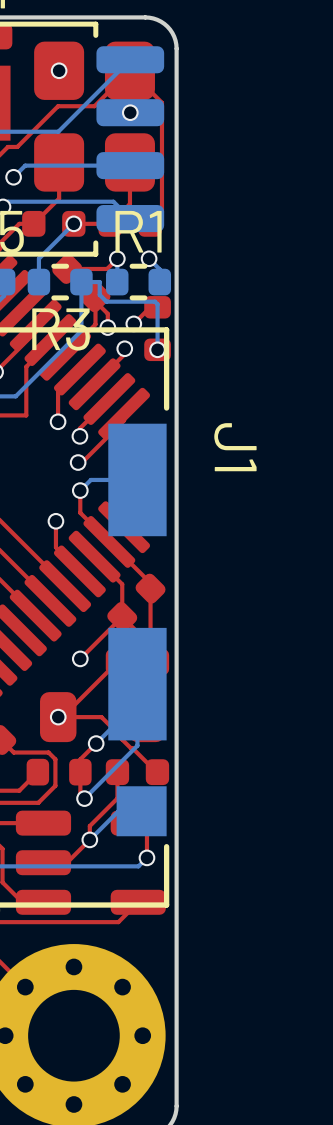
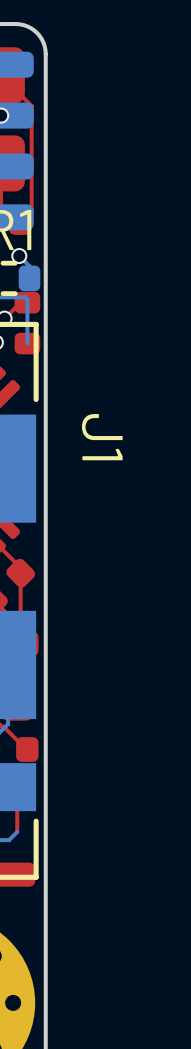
via: (157, 349) -> none
via: (146, 857) -> none

